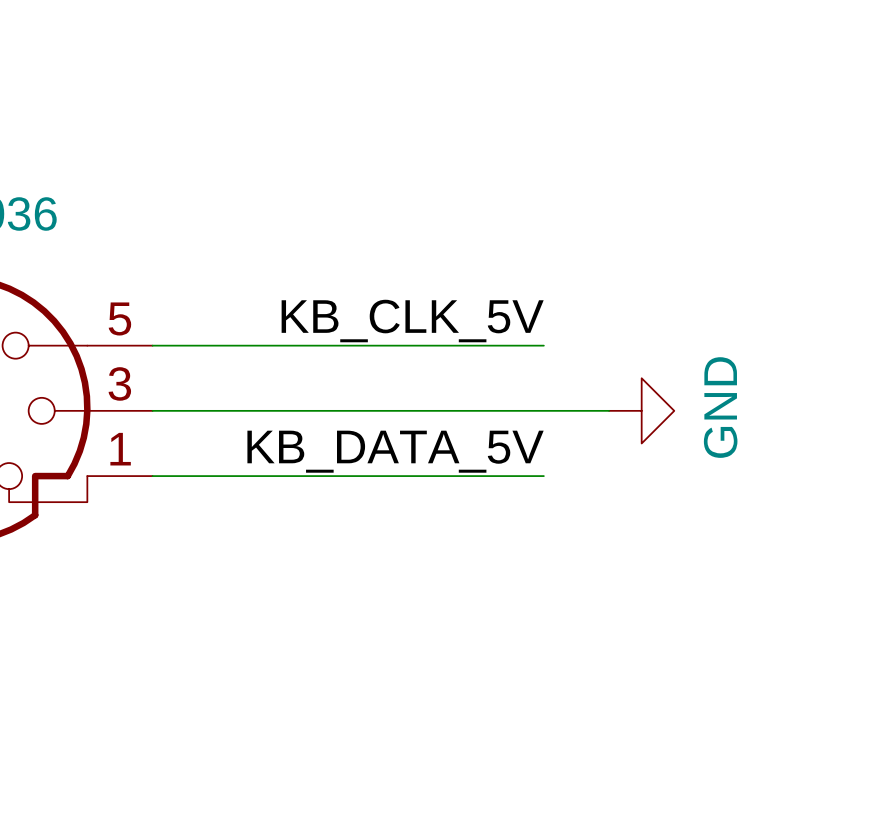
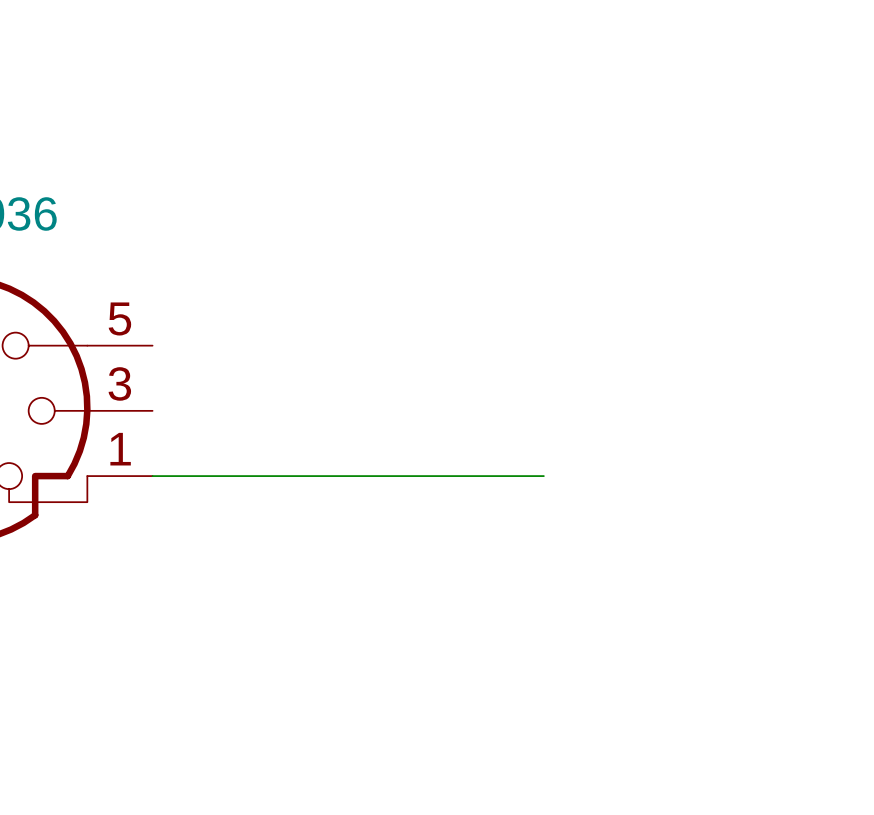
label: KB_CLK_5V (412, 321) -> none
wire: (152, 345) (543, 345) -> none
wire: (152, 410) (609, 410) -> none
power symbol: GND (641, 410) -> none
label: KB_DATA_5V (395, 451) -> none

